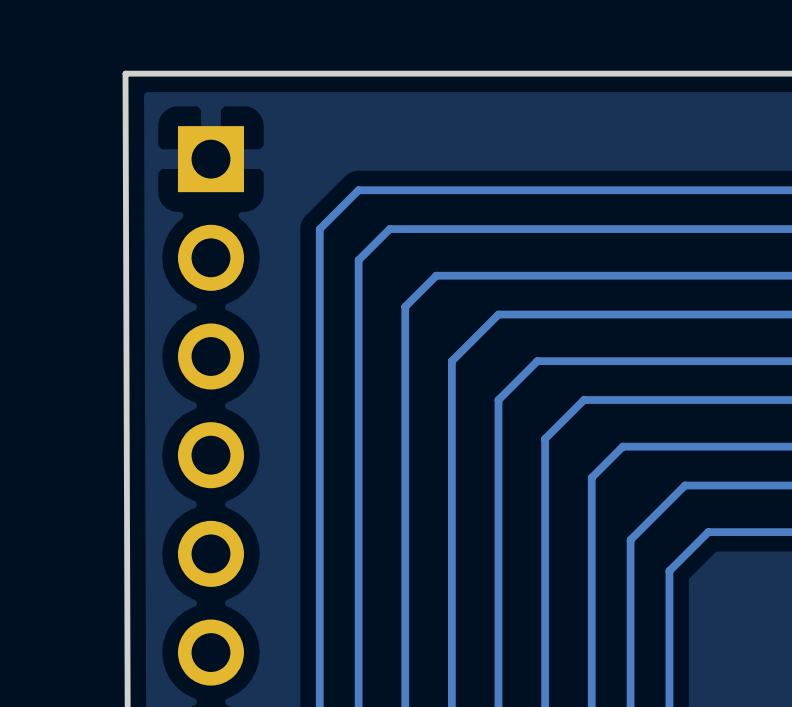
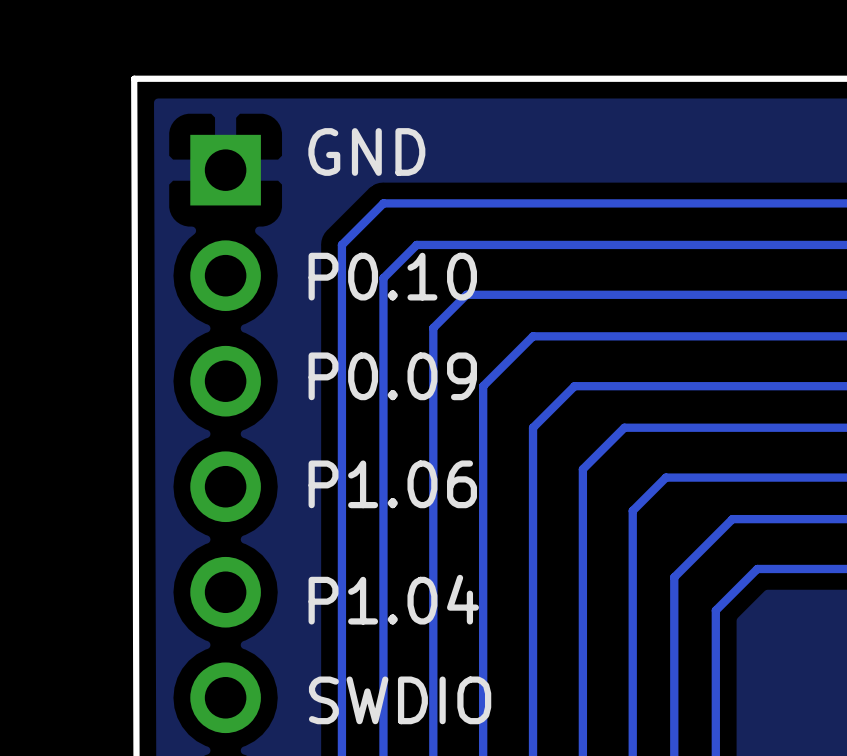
text: none -> GND (366, 151)
text: none -> P0.10 (392, 276)
text: none -> P0.09 (392, 376)
text: none -> P1.06 (392, 484)
text: none -> P1.04 (393, 599)
text: none -> SWDIO (400, 700)

